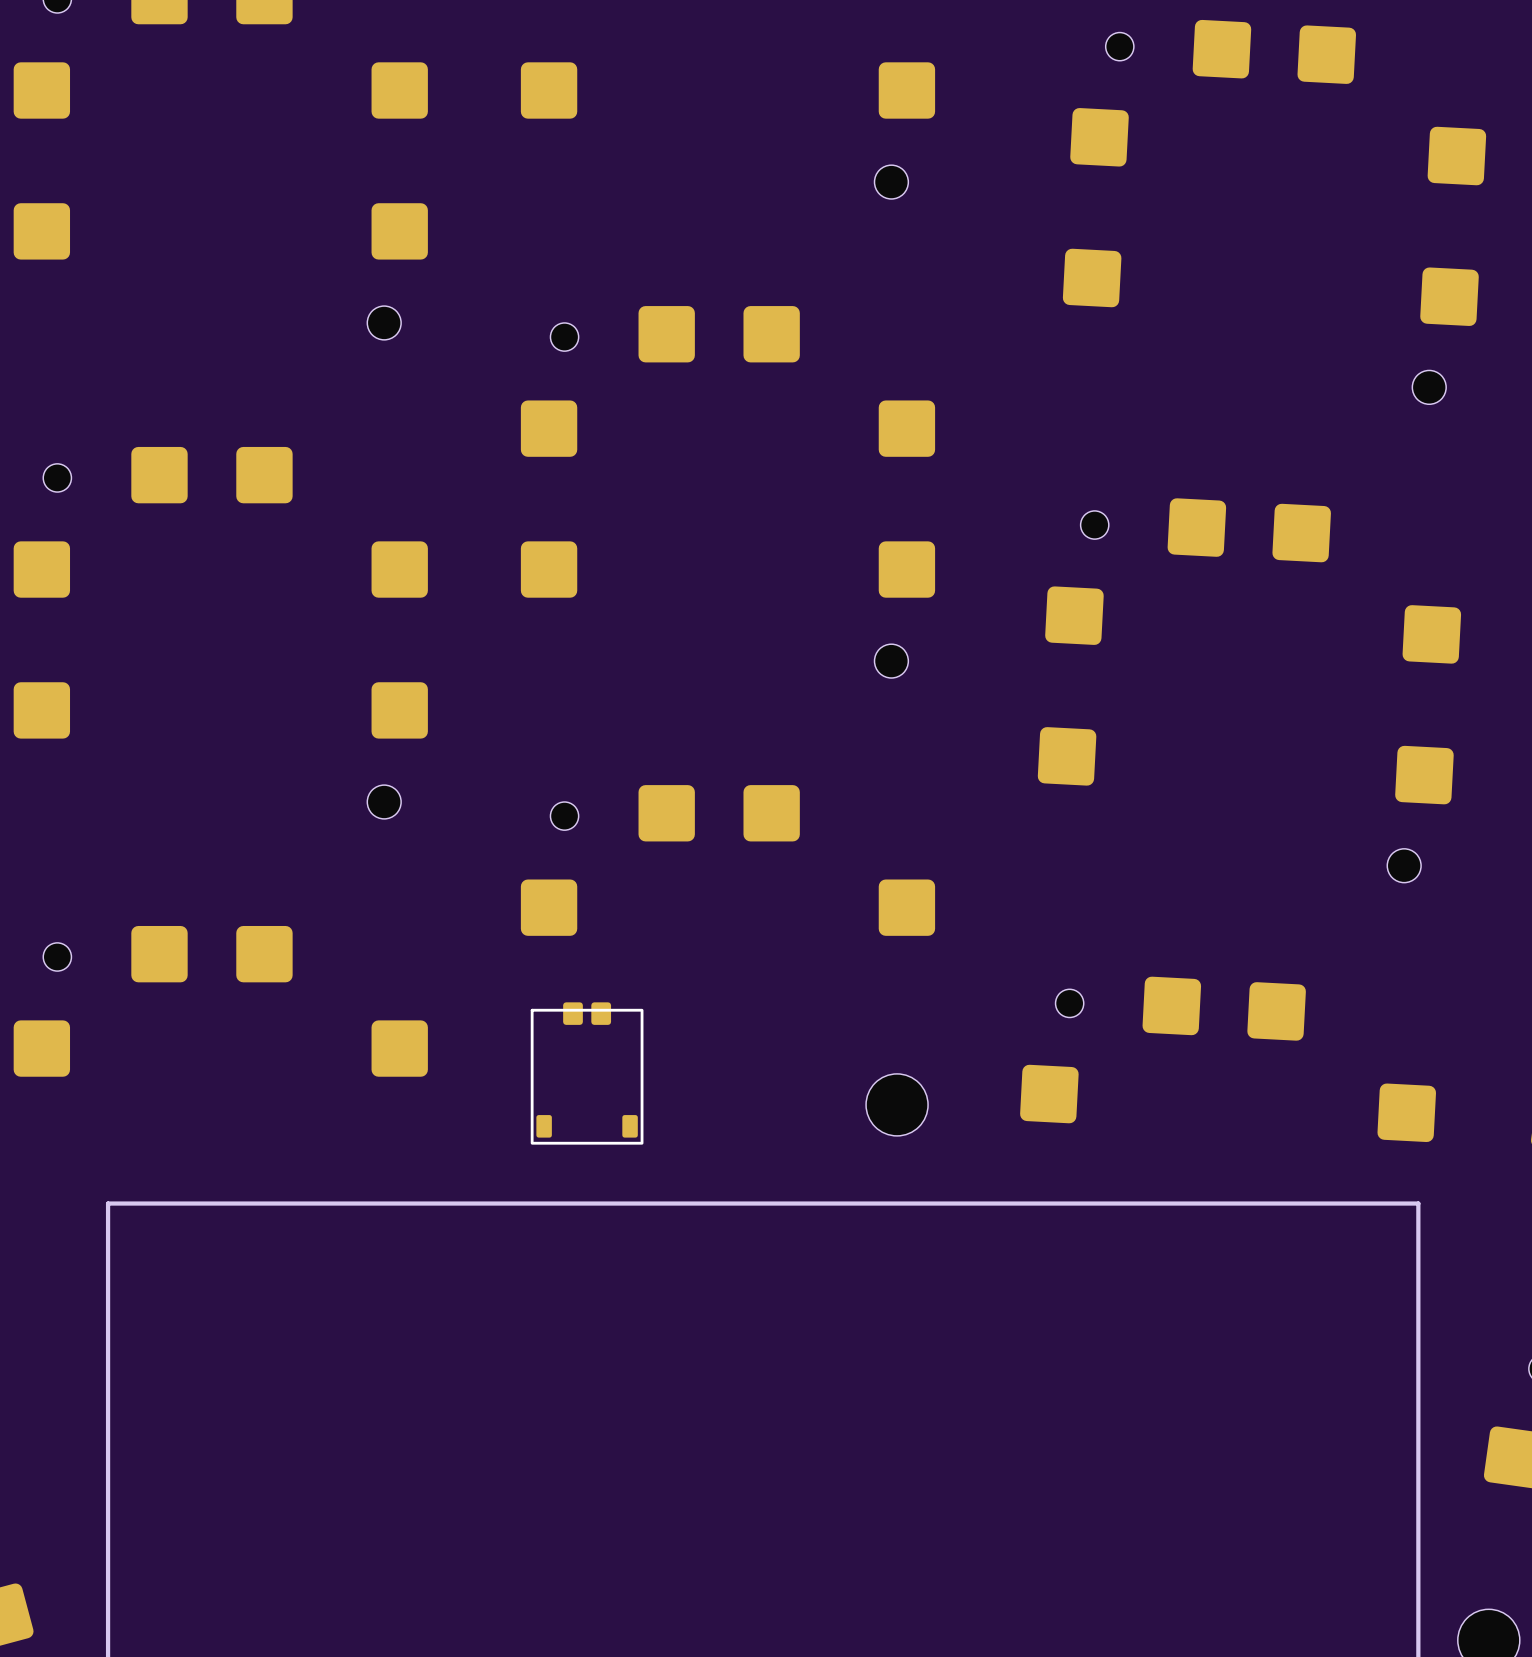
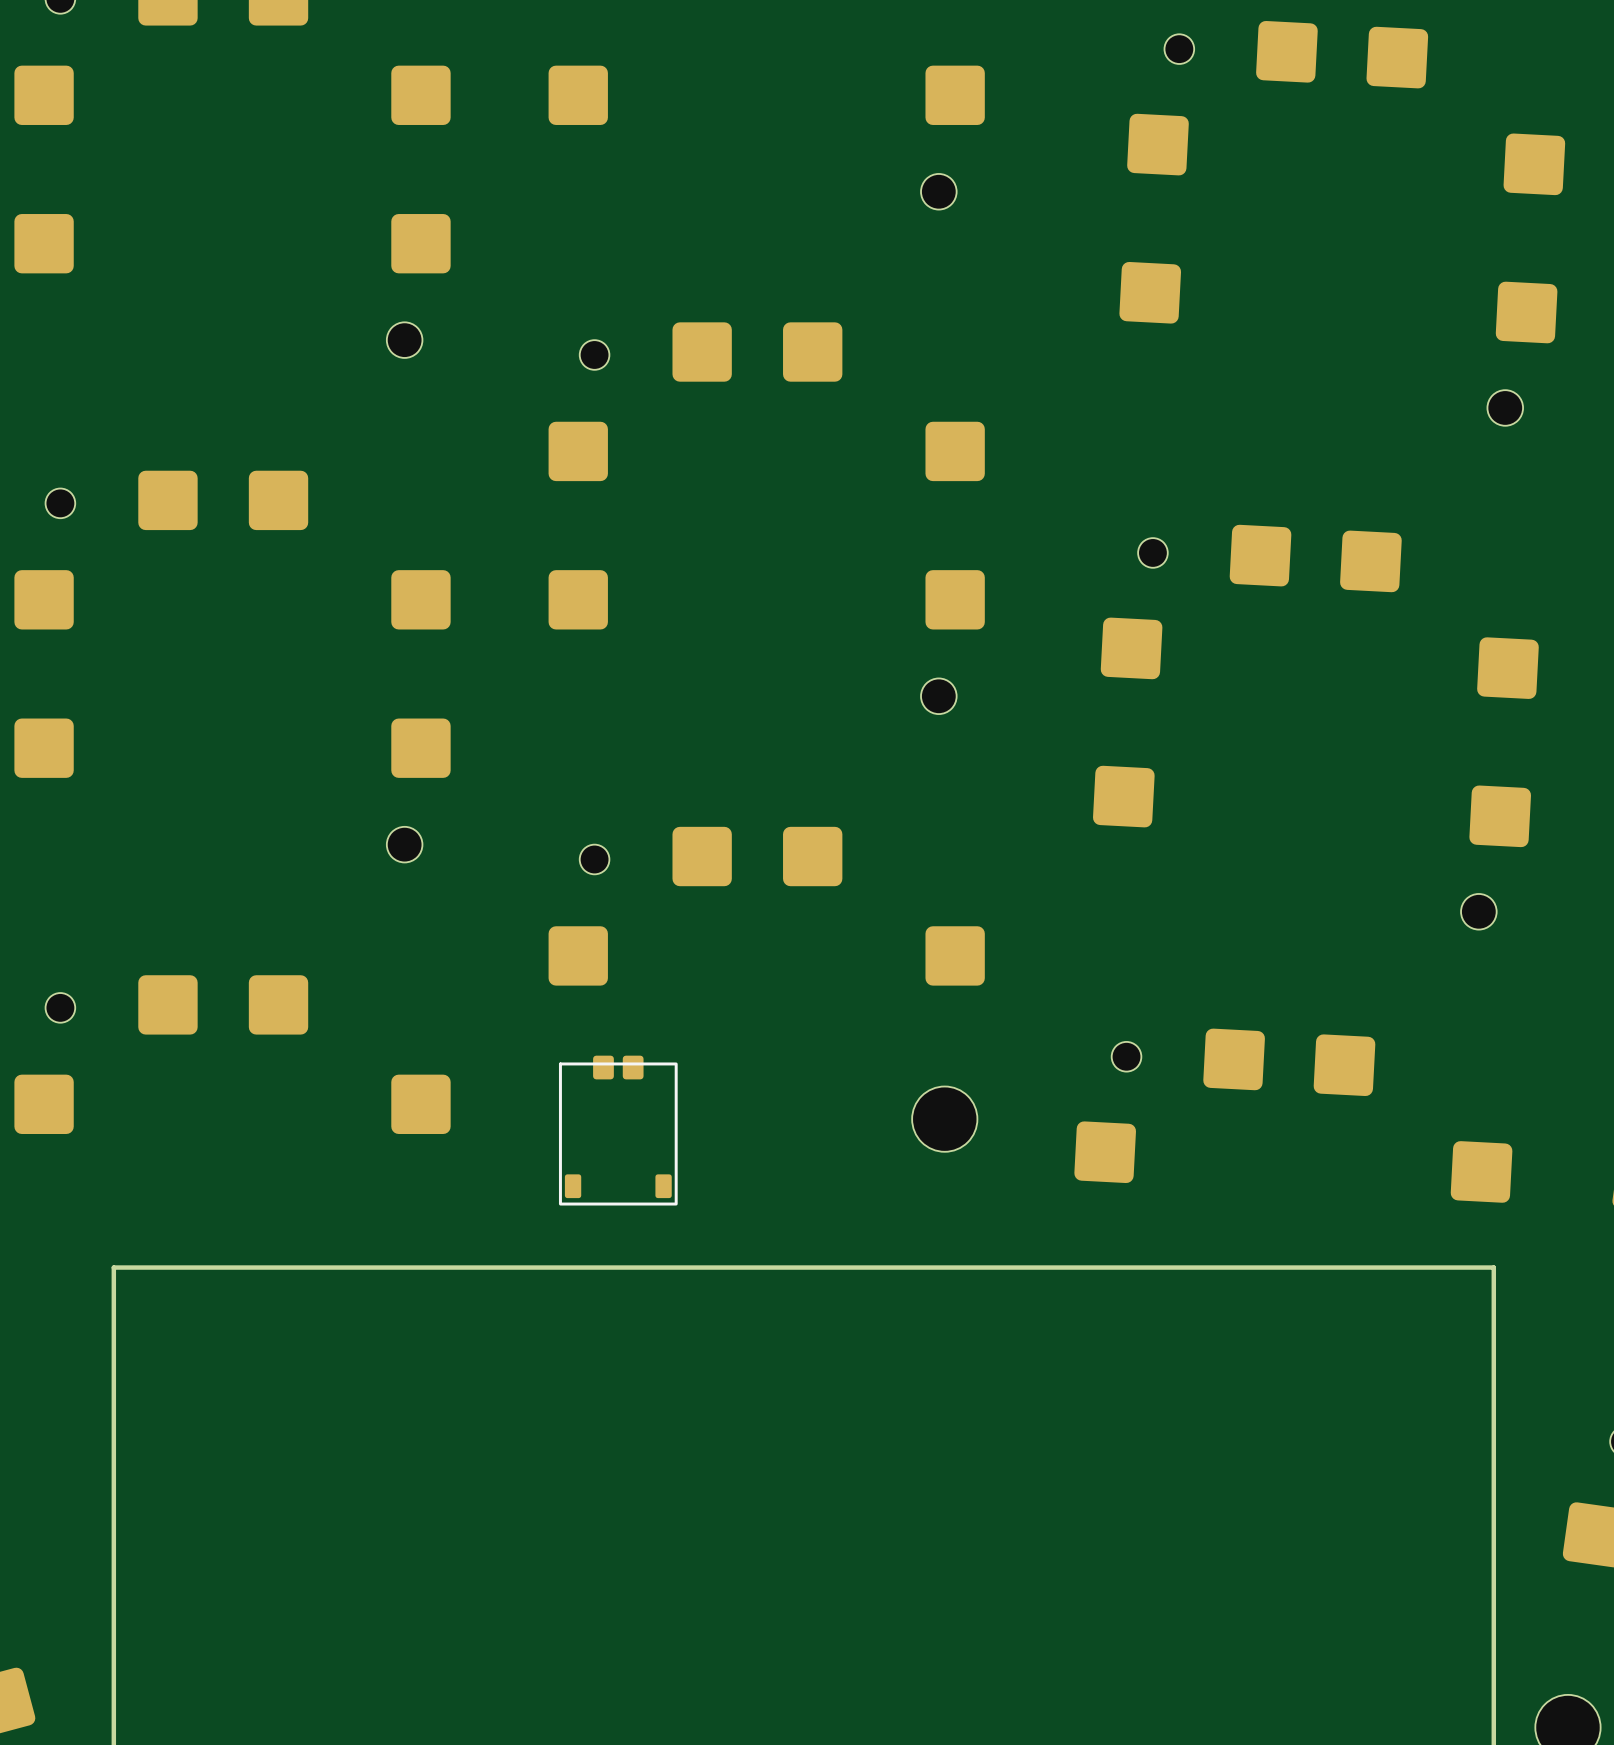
part position: (897, 1104) -> (944, 1119)

